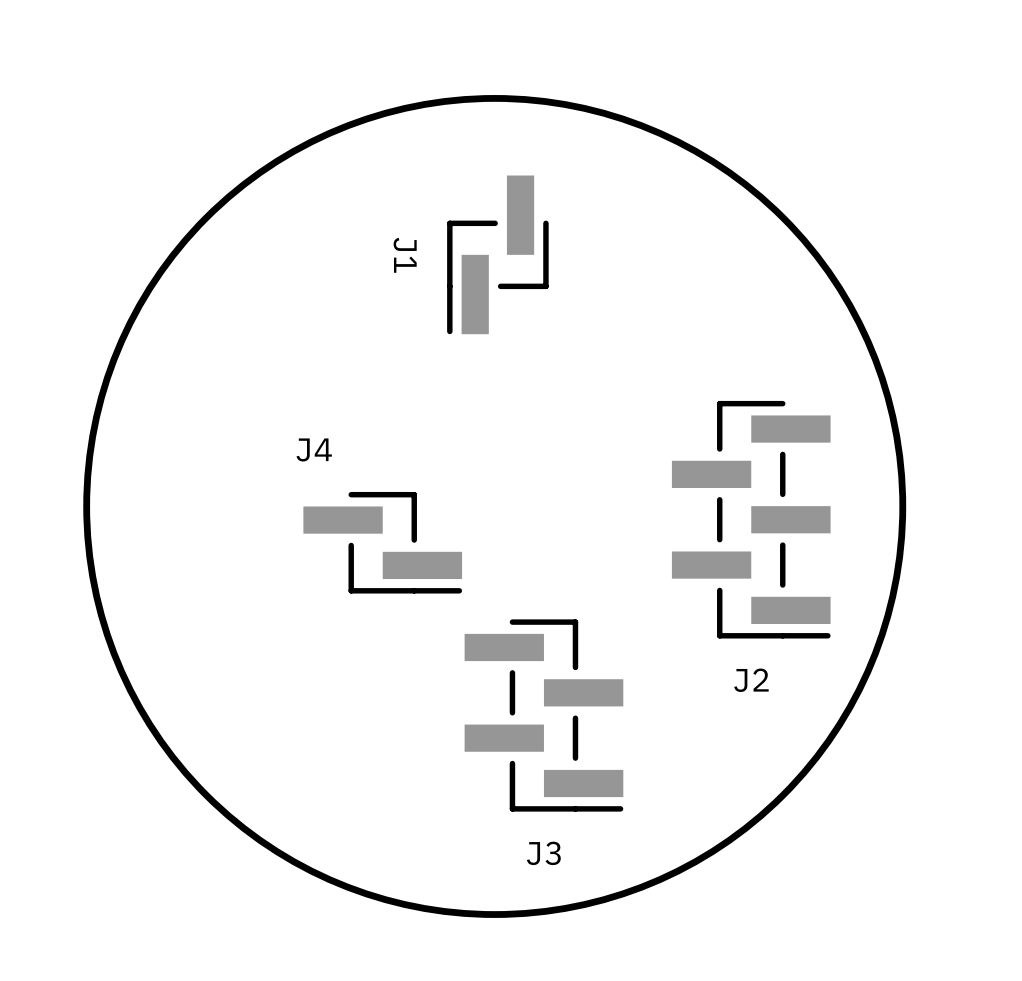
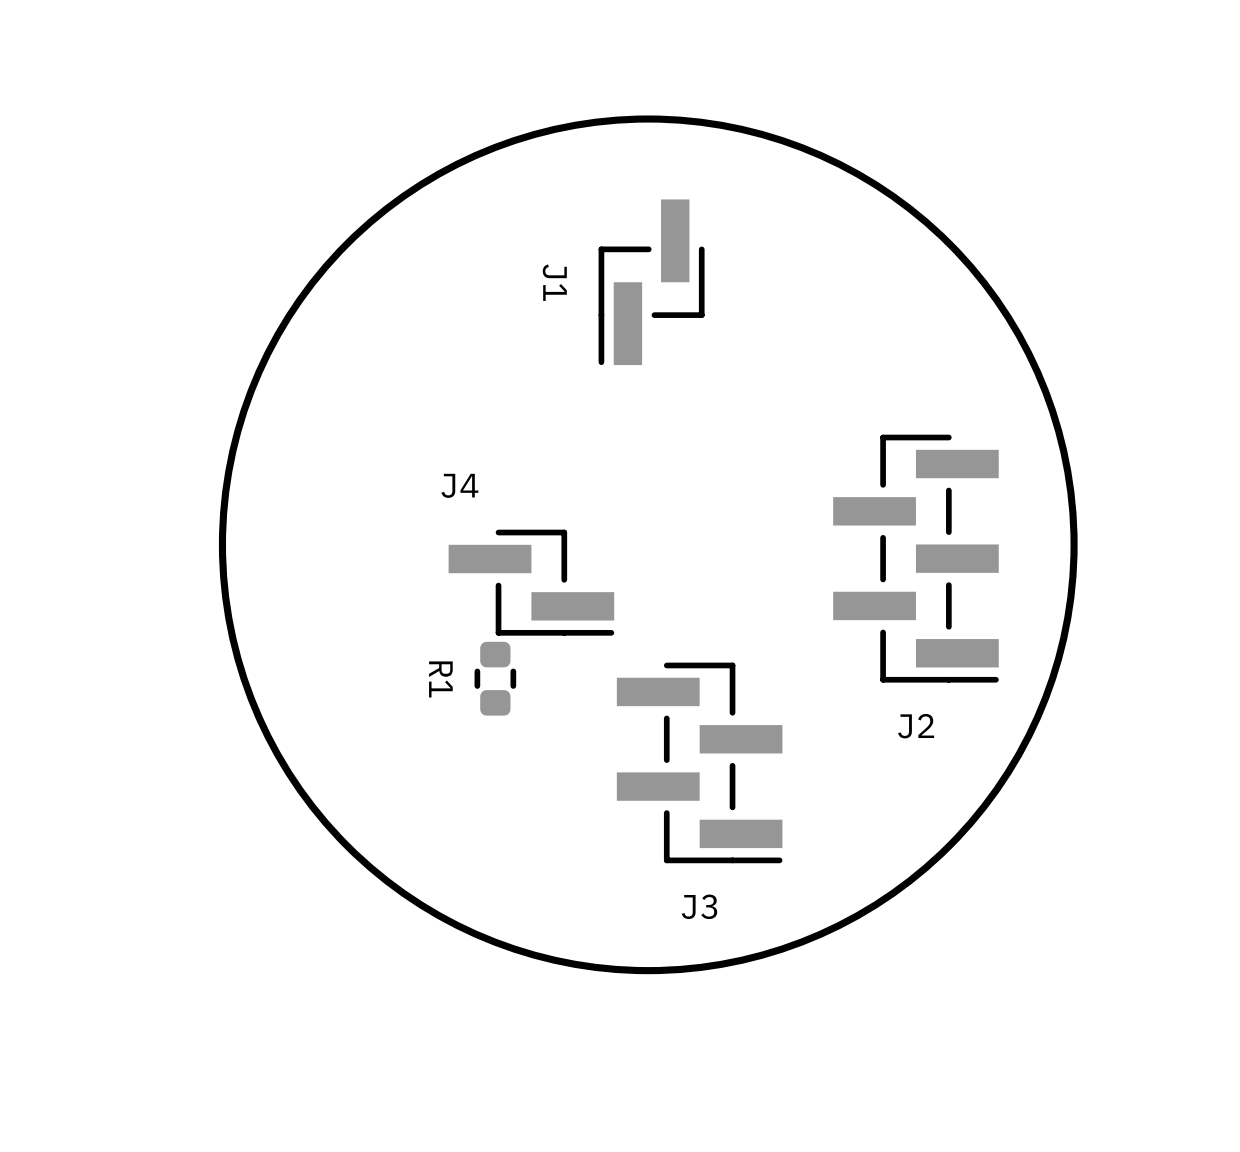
R1: none -> (495, 678)

